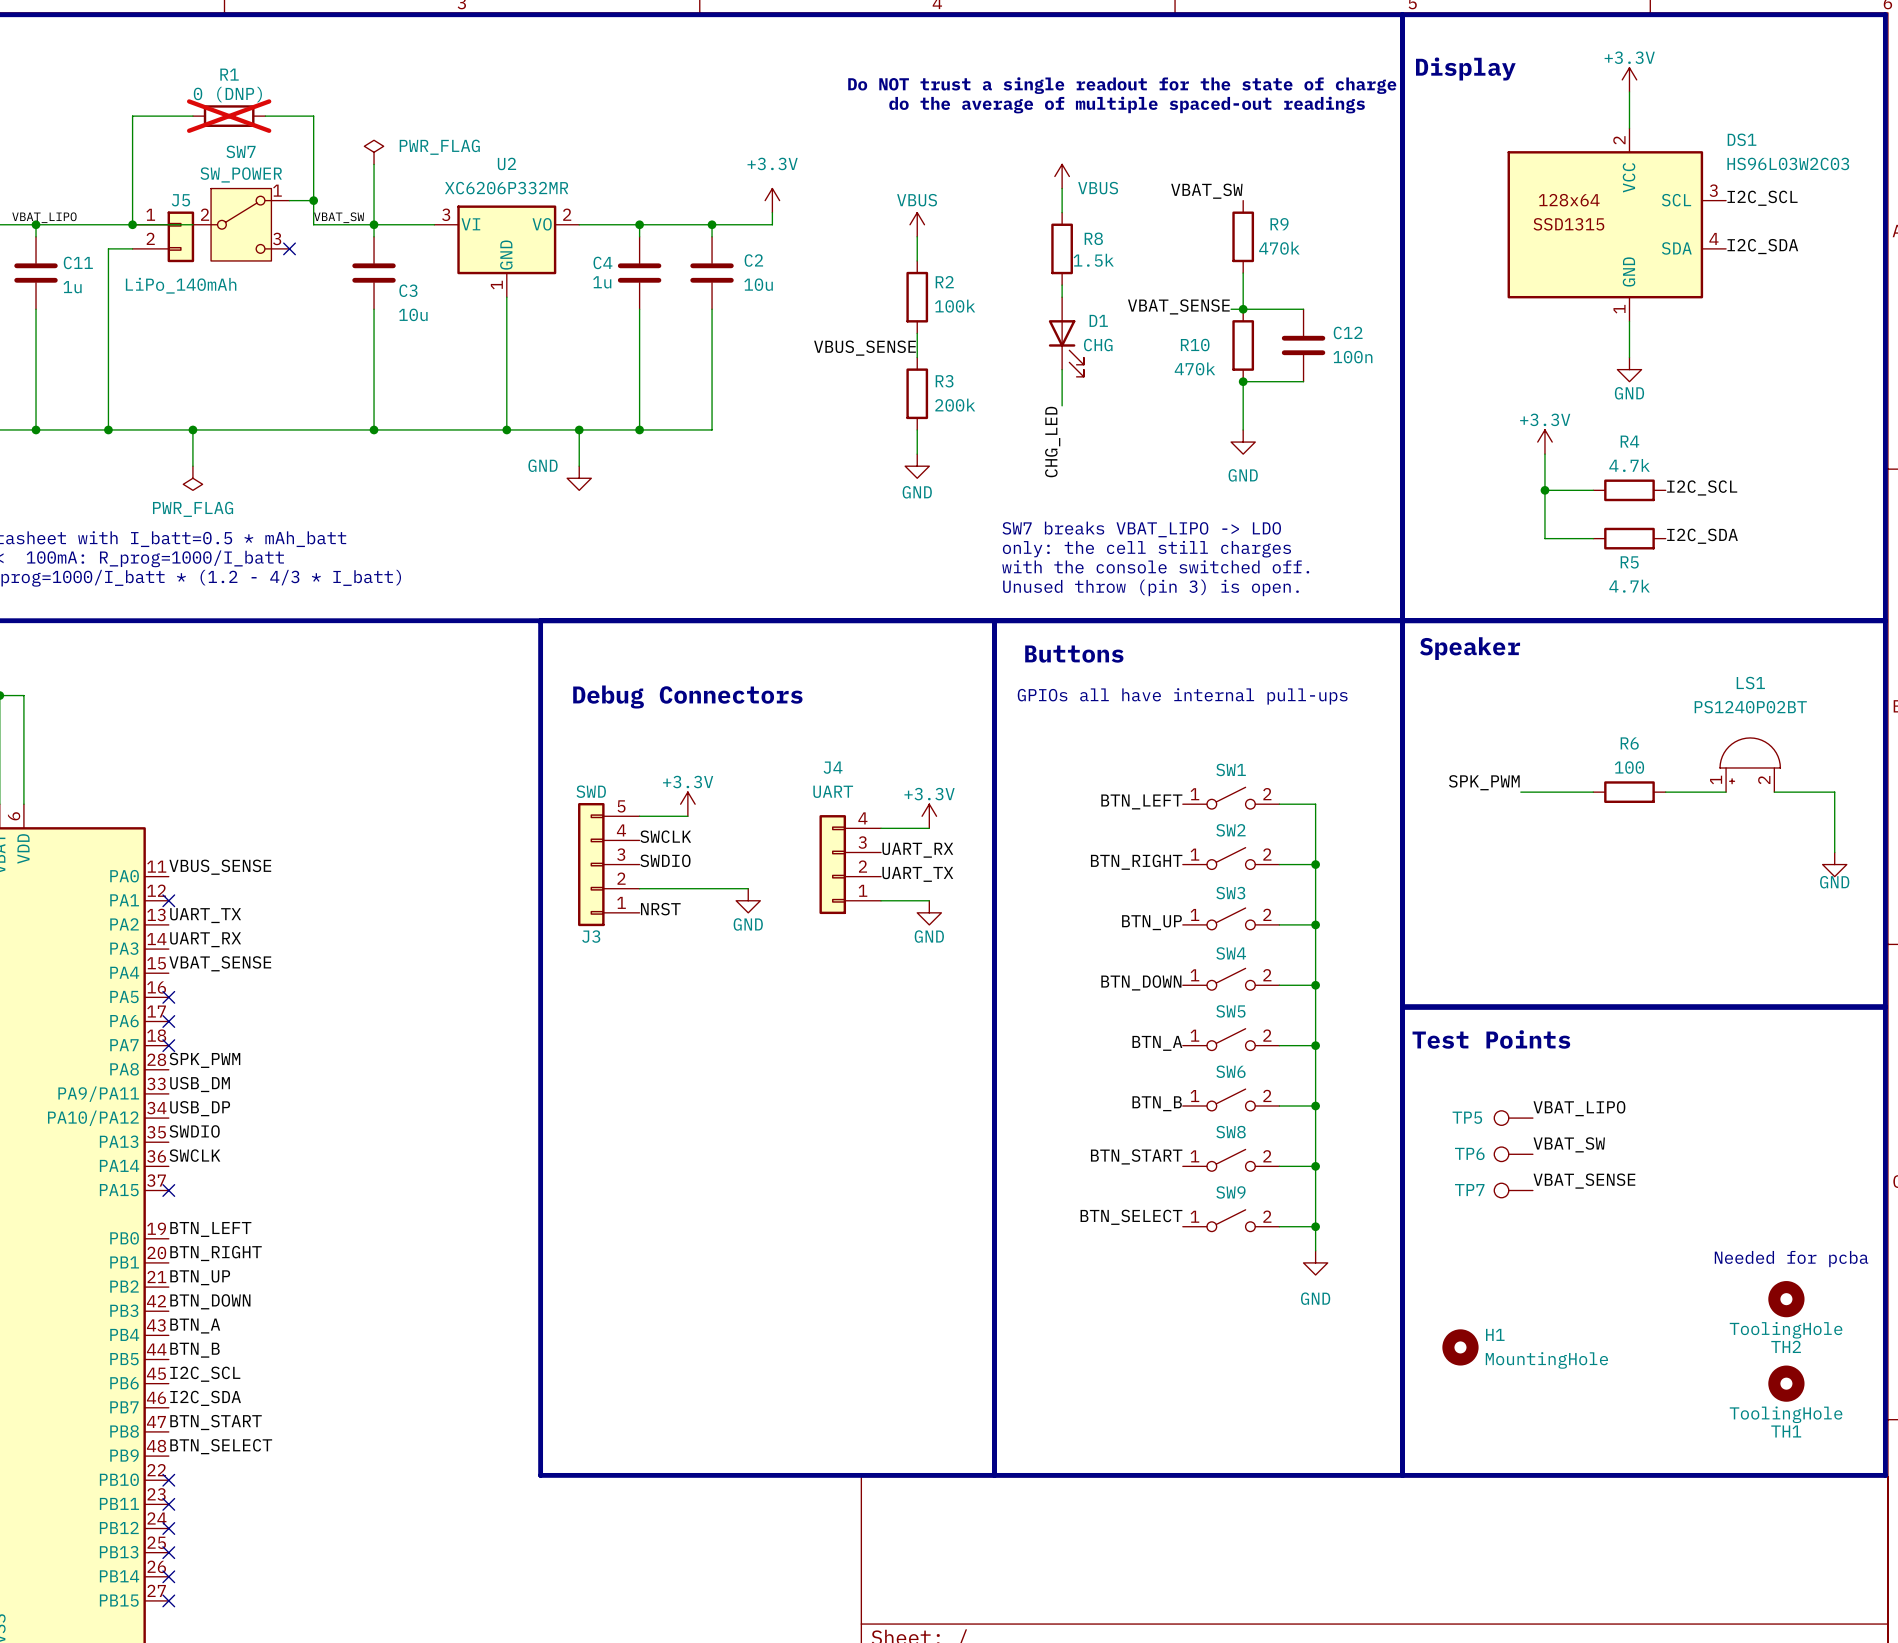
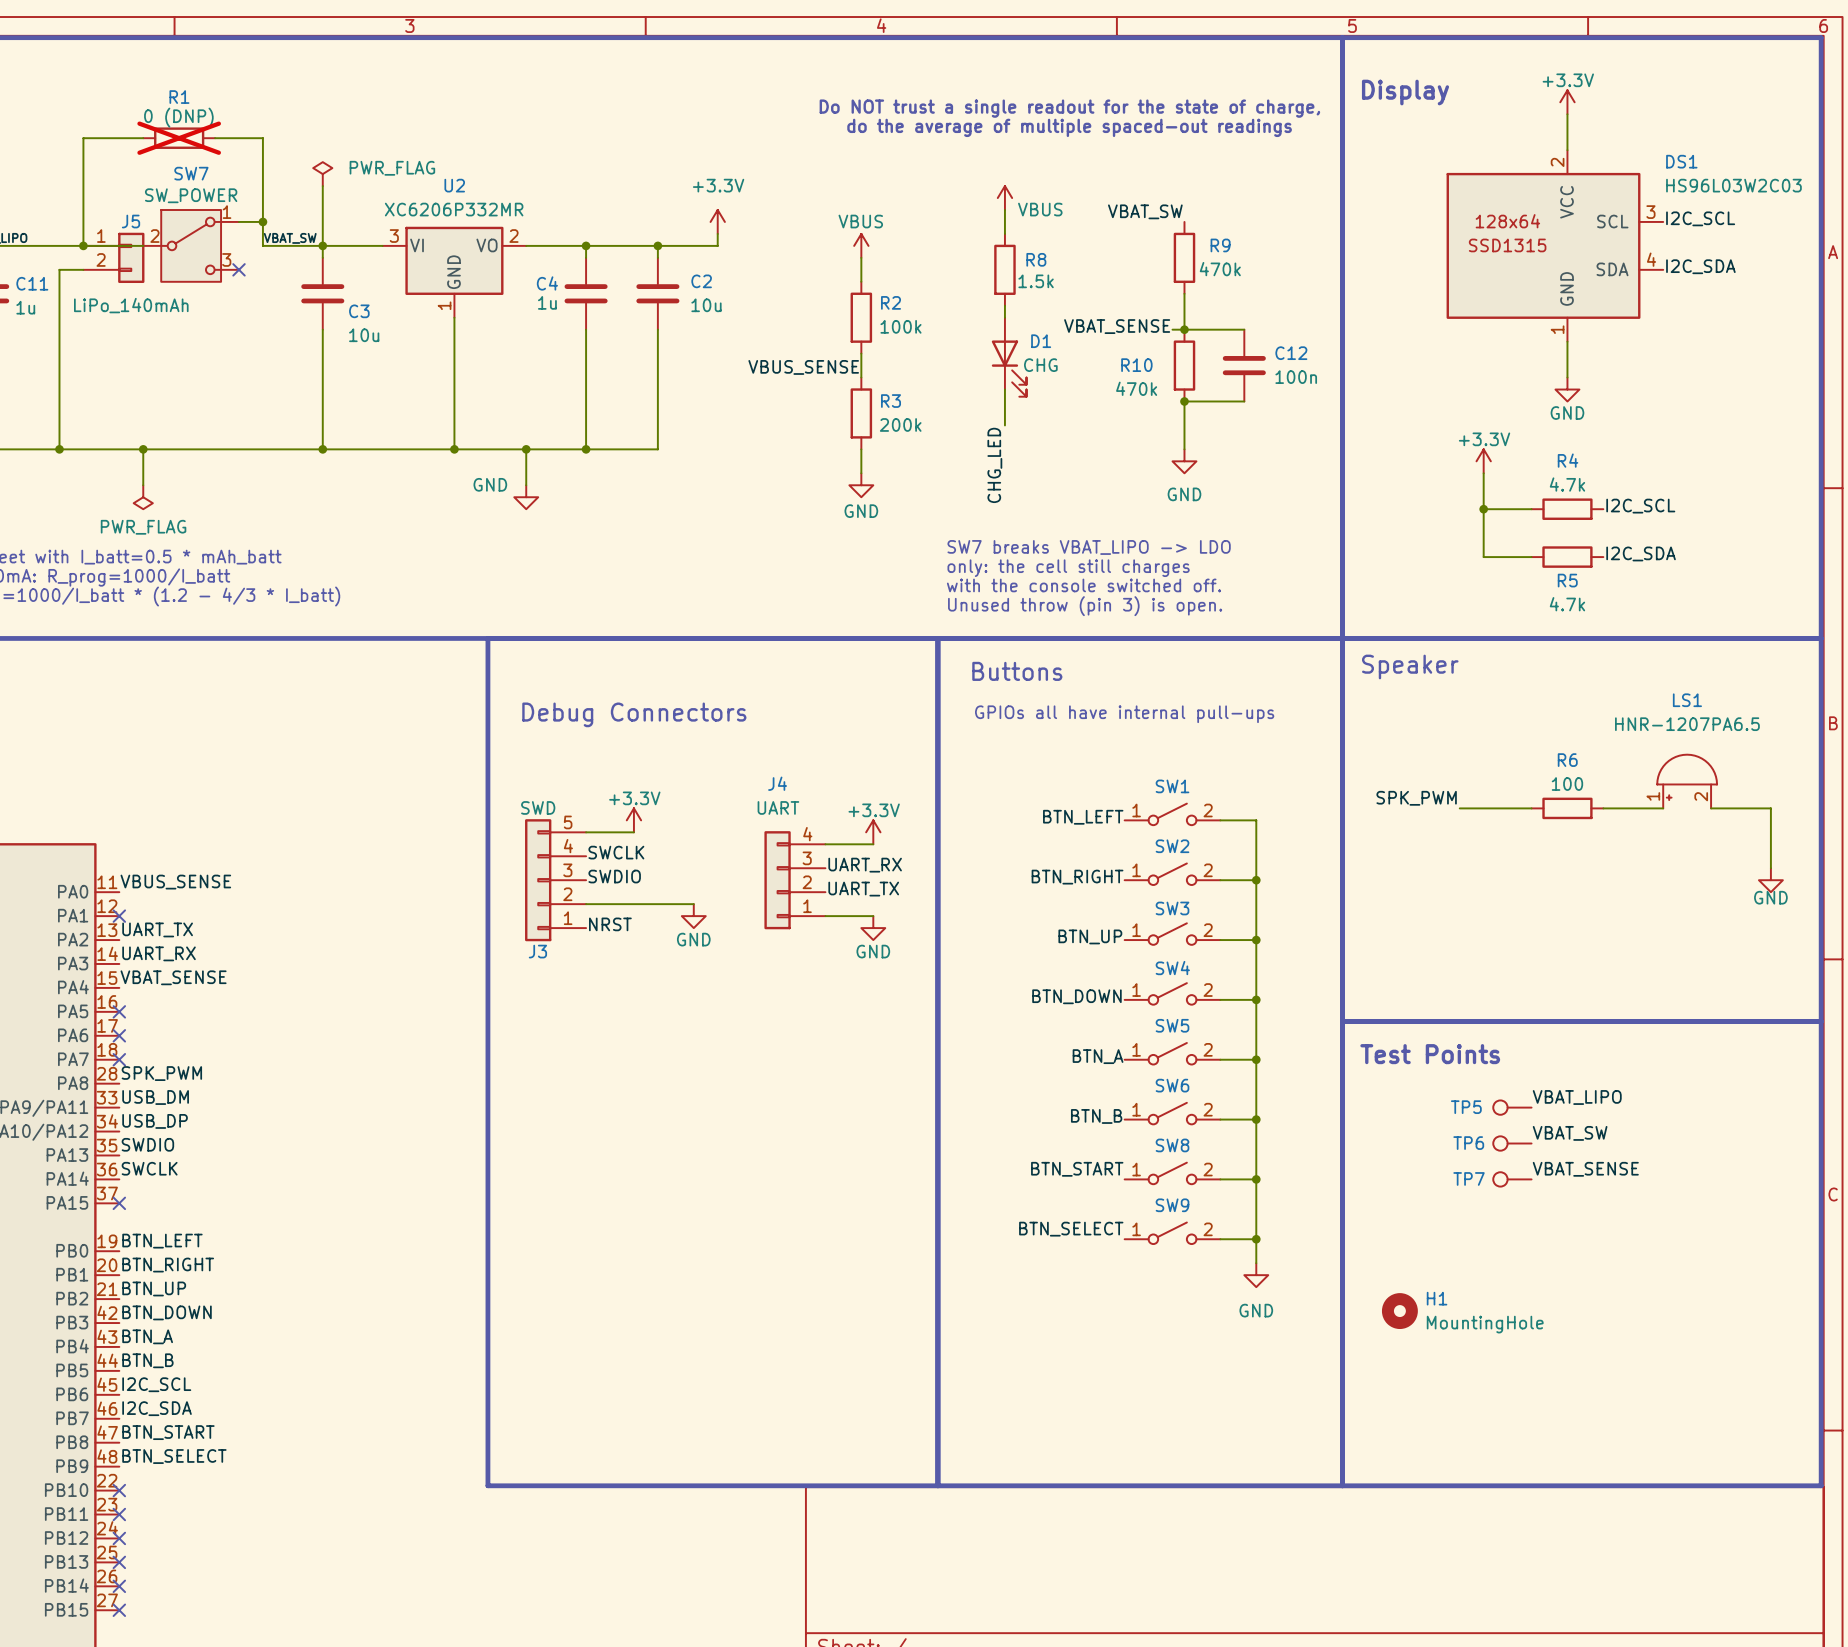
LS1 value: PS1240P02BT (1750, 707) -> HNR-1207PA6.5 (1687, 724)
label position: VBAT_LIPO (1579, 1108) -> VBAT_LIPO (1577, 1097)
TP5 position: (1513, 1118) -> (1512, 1107)
label position: VBAT_SW (1569, 1144) -> VBAT_SW (1570, 1133)
TP6 position: (1513, 1154) -> (1512, 1143)
label position: VBAT_SENSE (1584, 1181) -> VBAT_SENSE (1585, 1169)
TP7 position: (1513, 1190) -> (1512, 1179)
text: Needed for pcba (1791, 1259) -> none
TH2: ToolingHole (1786, 1299) -> none
H1 position: (1460, 1347) -> (1399, 1311)
TH1: ToolingHole (1786, 1383) -> none

